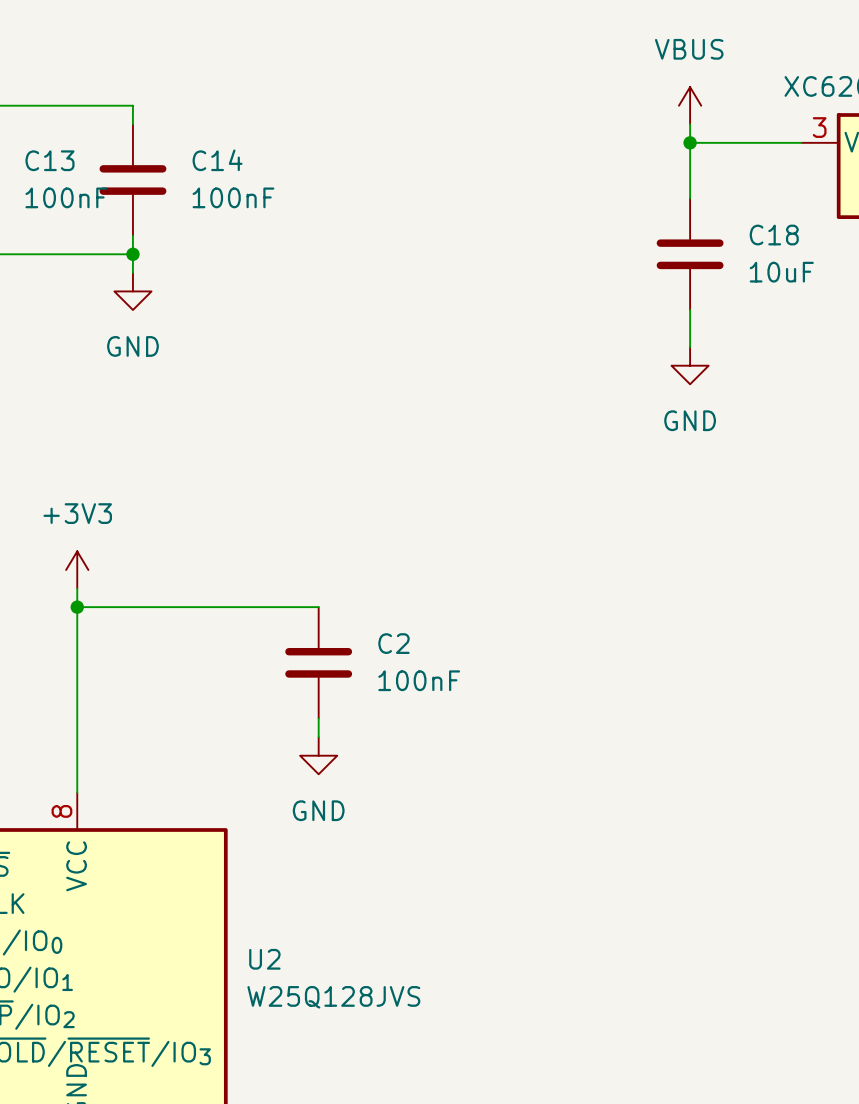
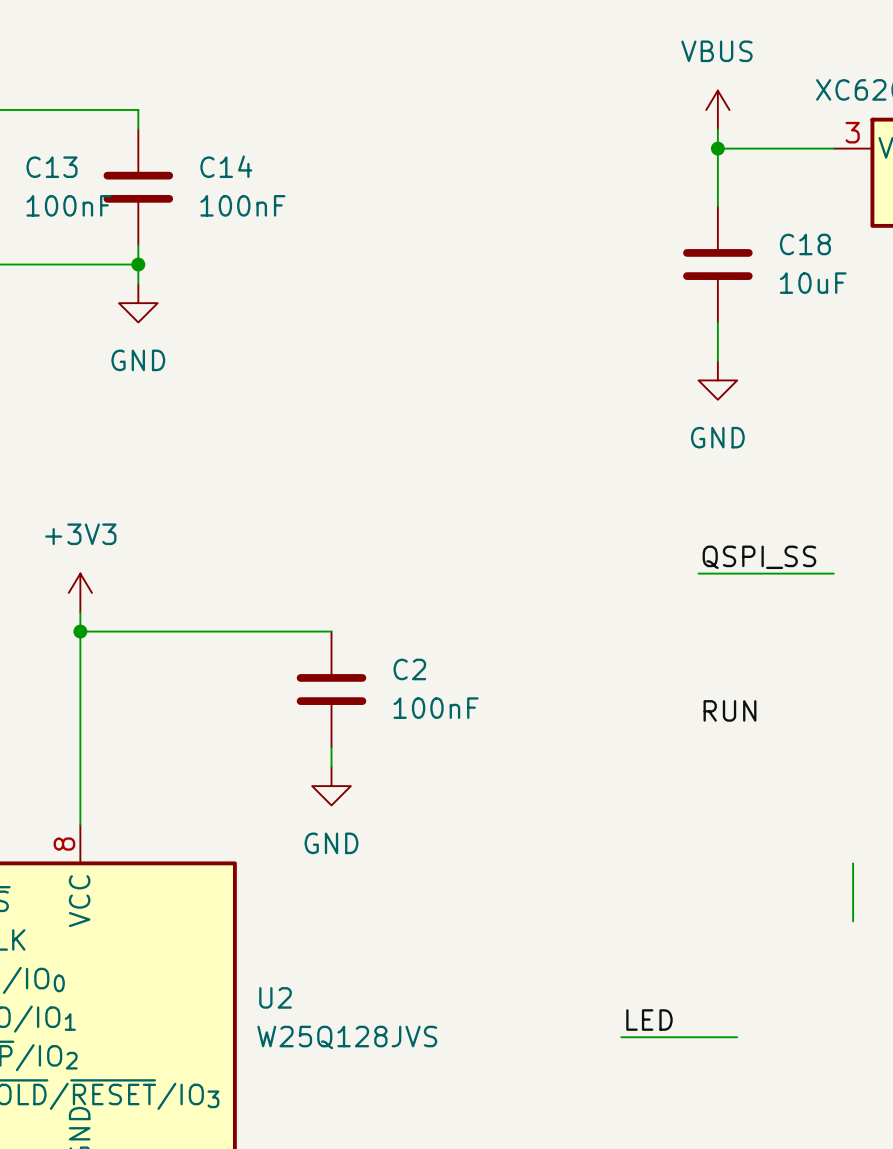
label: none -> QSPI_SS (759, 557)
wire: none -> (698, 573) (833, 573)
label: none -> RUN (729, 710)
wire: none -> (853, 863) (853, 921)
label: none -> LED (649, 1020)
wire: none -> (621, 1037) (737, 1037)

